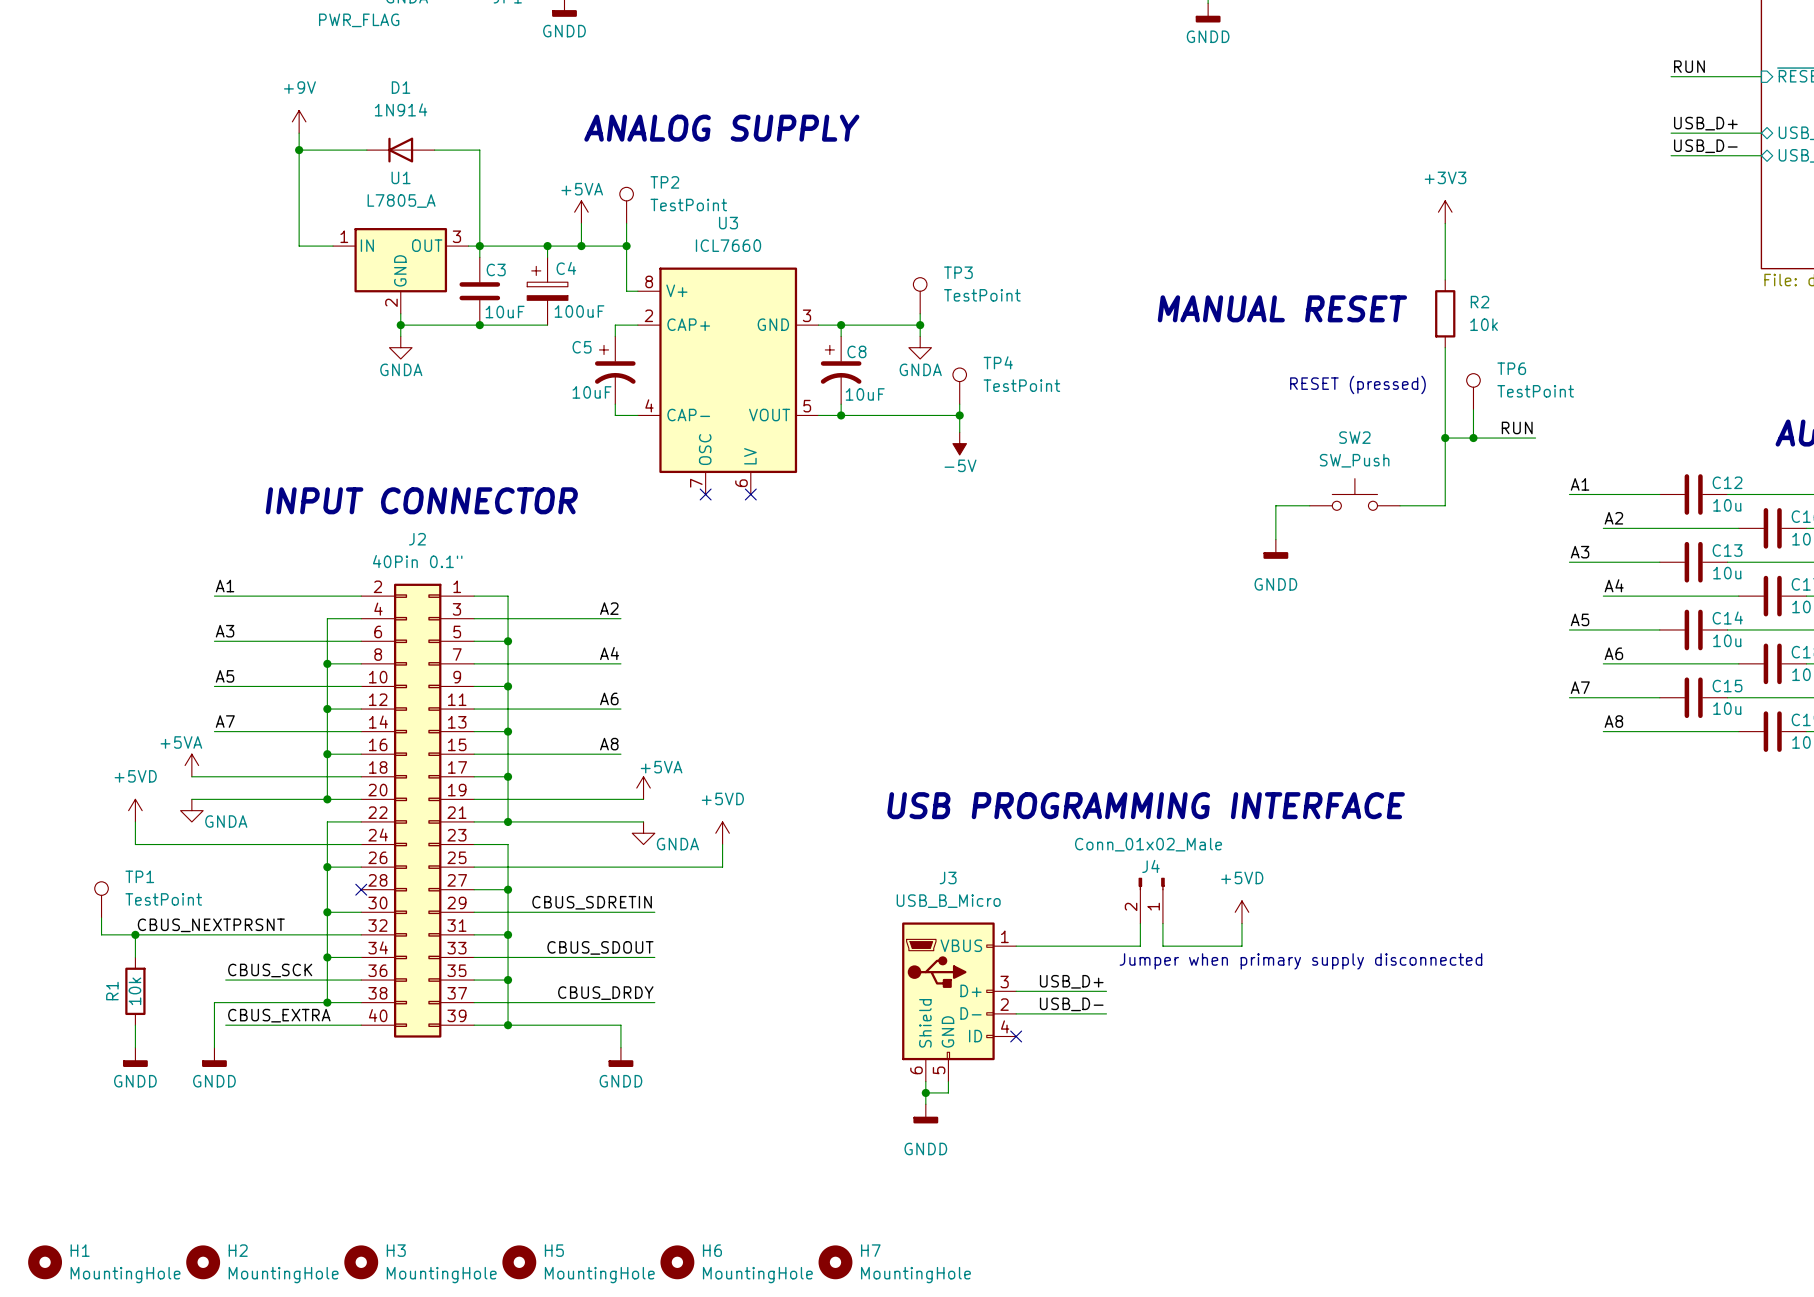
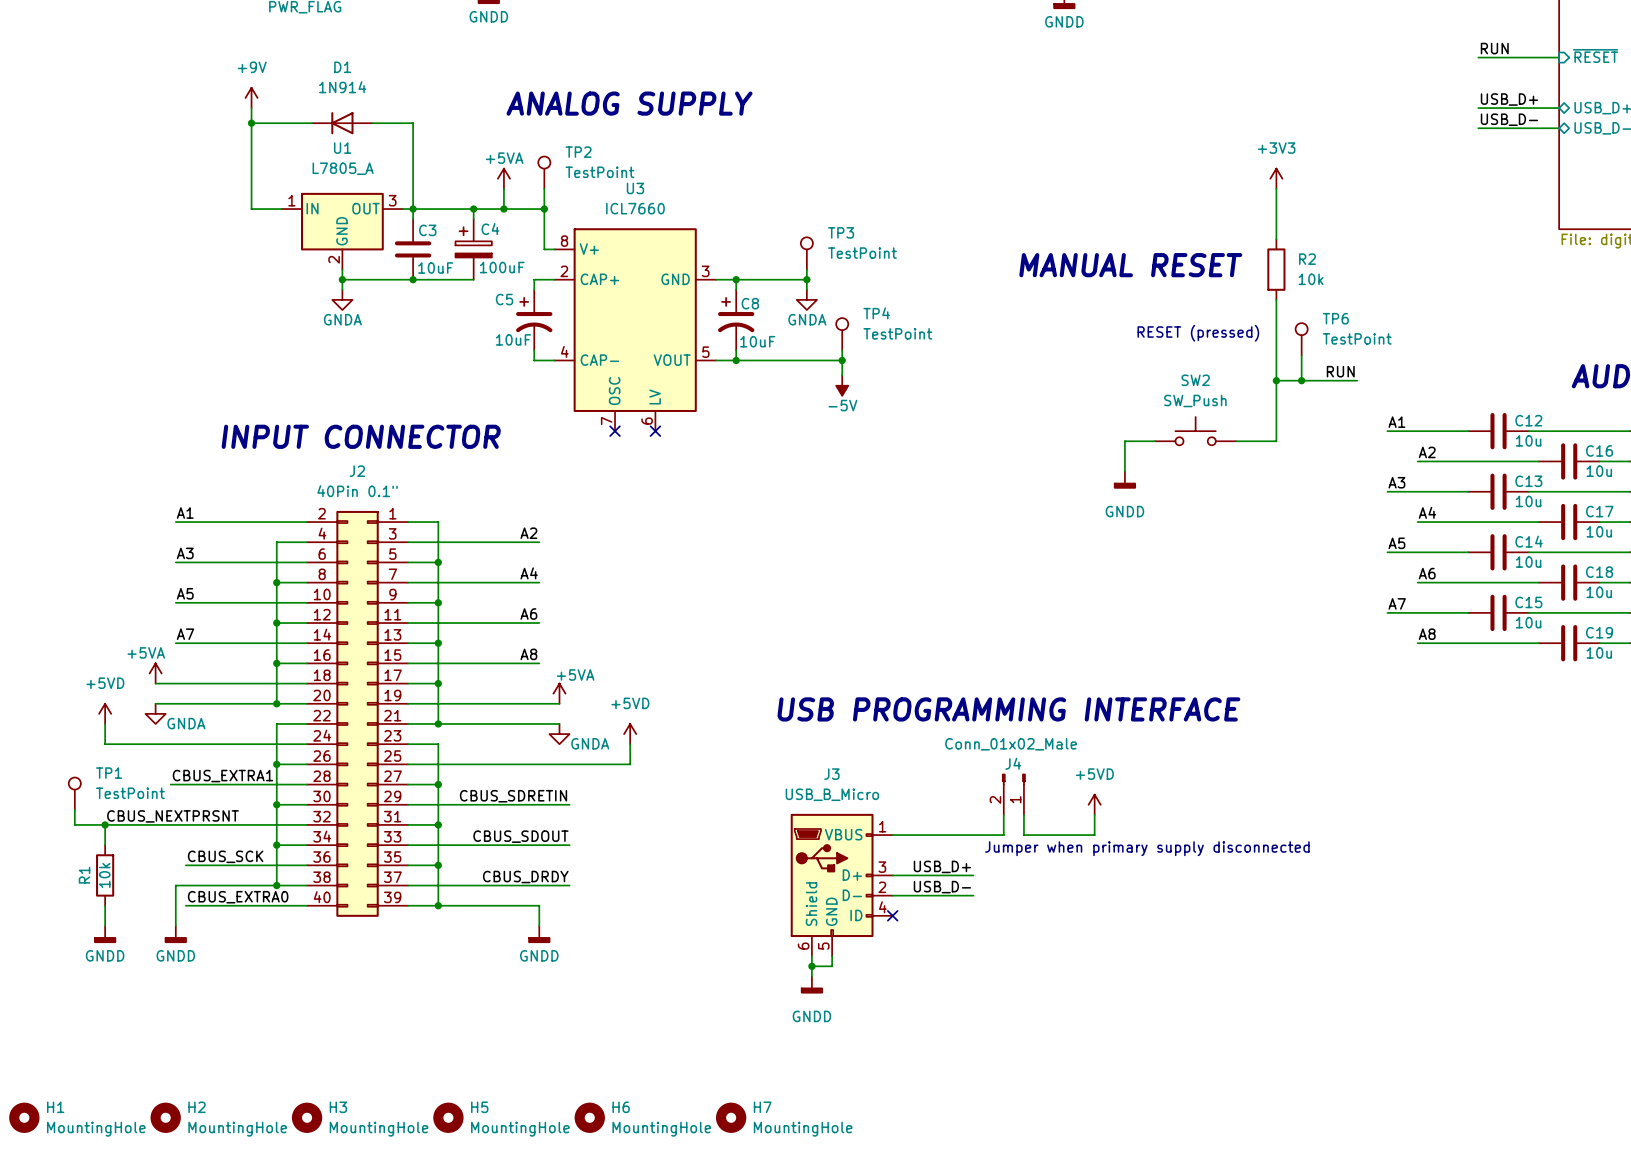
label: none -> CBUS_EXTRA1 (222, 776)
wire: none -> (170, 784) (307, 784)
no-connect mark: (361, 889) -> none
label: CBUS_EXTRA (279, 1015) -> CBUS_EXTRA0 (238, 897)

